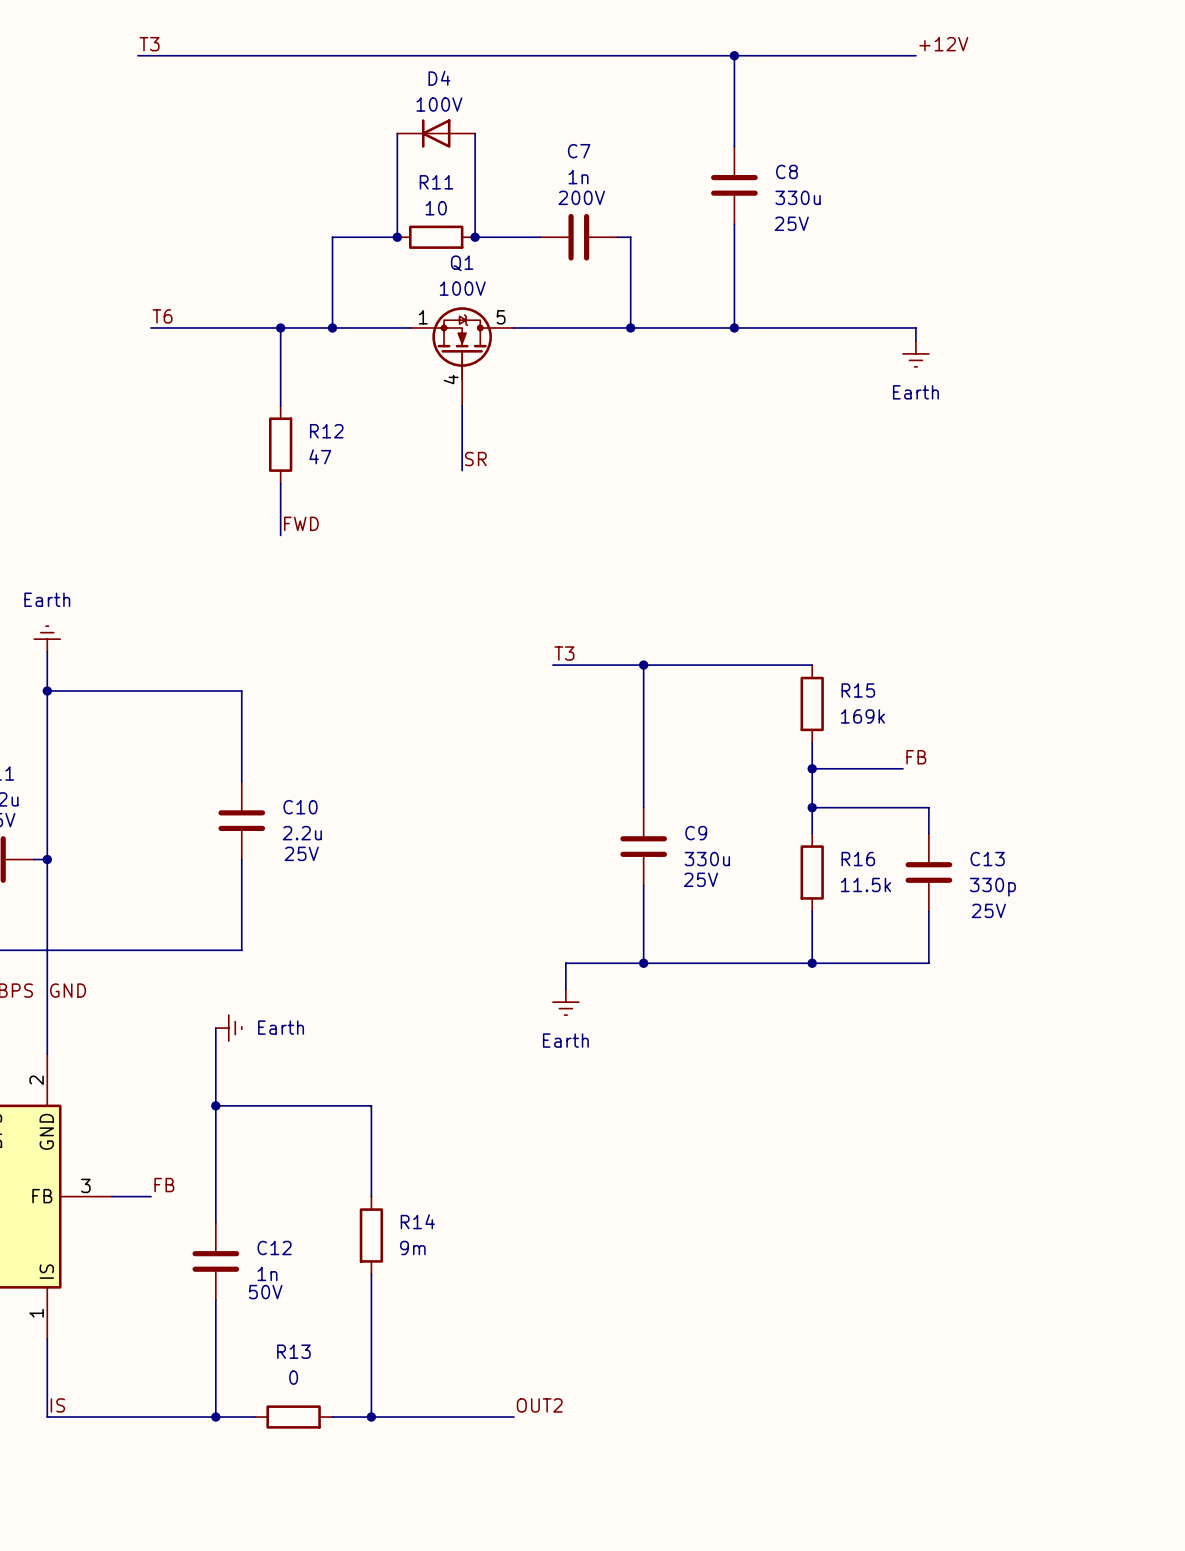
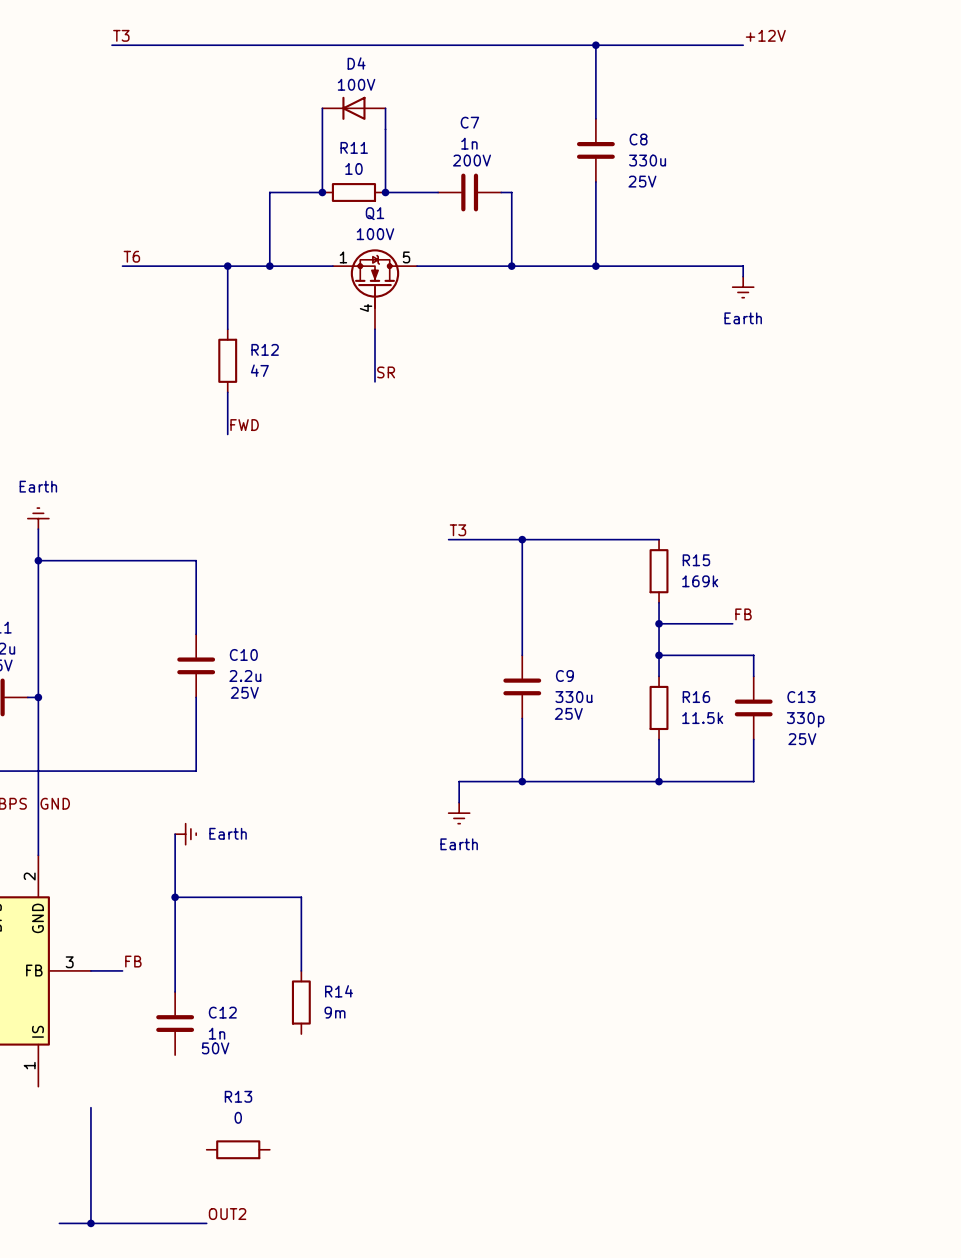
wire: (371, 1274) (371, 1417) -> none
wire: (215, 1300) (215, 1417) -> none
wire: (47, 1339) (47, 1417) (254, 1417) -> none
wire: none -> (90, 1107) (90, 1223)
label: IS (57, 1405) -> none
label: OUT2 (539, 1405) -> none
junction: (215, 1417) -> none
wire: (332, 1417) (514, 1417) -> none
junction: (371, 1417) -> none
label: none -> OUT2 (227, 1214)
wire: none -> (59, 1223) (206, 1223)
junction: none -> (90, 1223)

